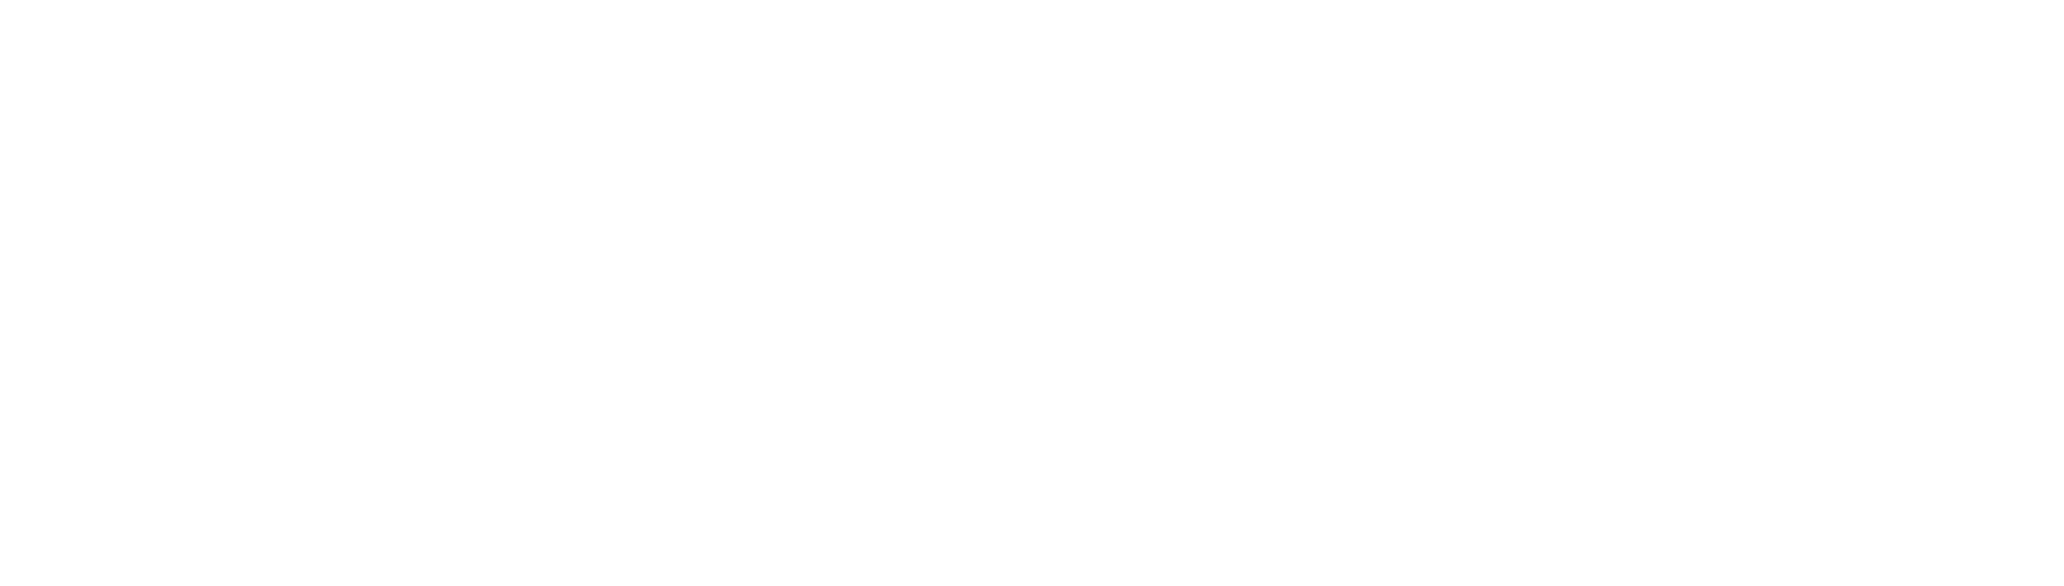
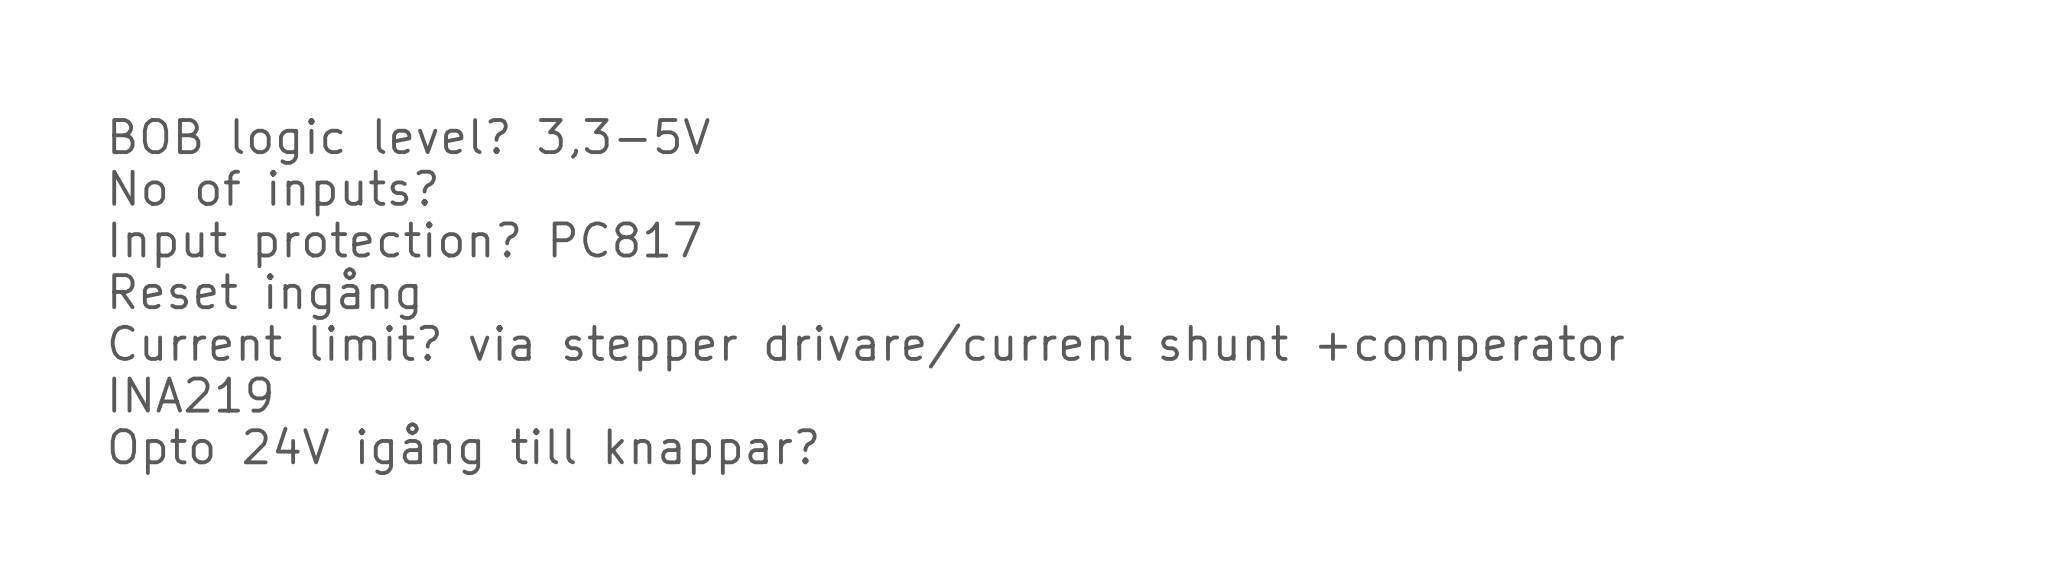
text: none -> BOB logic level? 3,3-5V (410, 141)
text: none -> No of inputs? (274, 193)
text: none -> Input protection? PC817 (406, 244)
text: none -> Reset ingång (264, 293)
text: none -> Current limit? via stepper drivare/current shunt +comperator (867, 347)
text: none -> INA219 (191, 394)
text: none -> Opto 24V igång till knappar? (463, 448)

